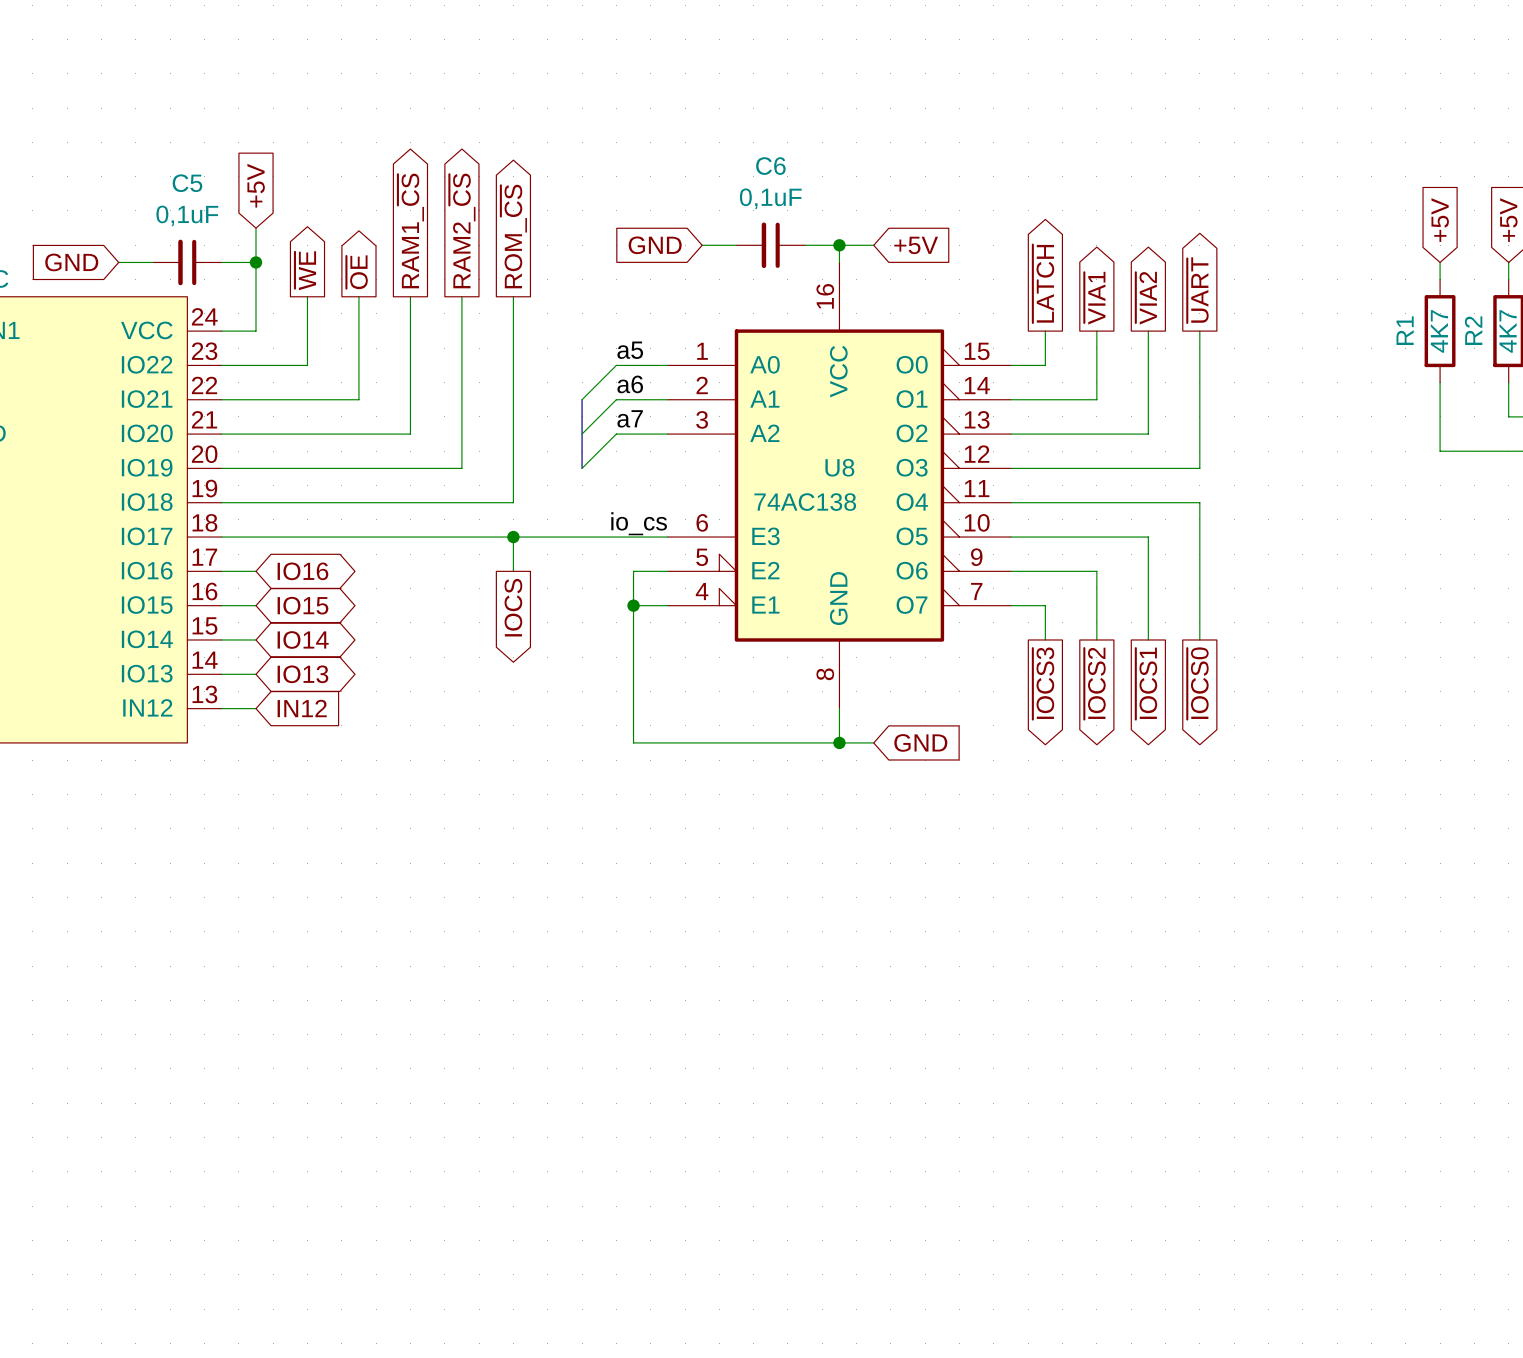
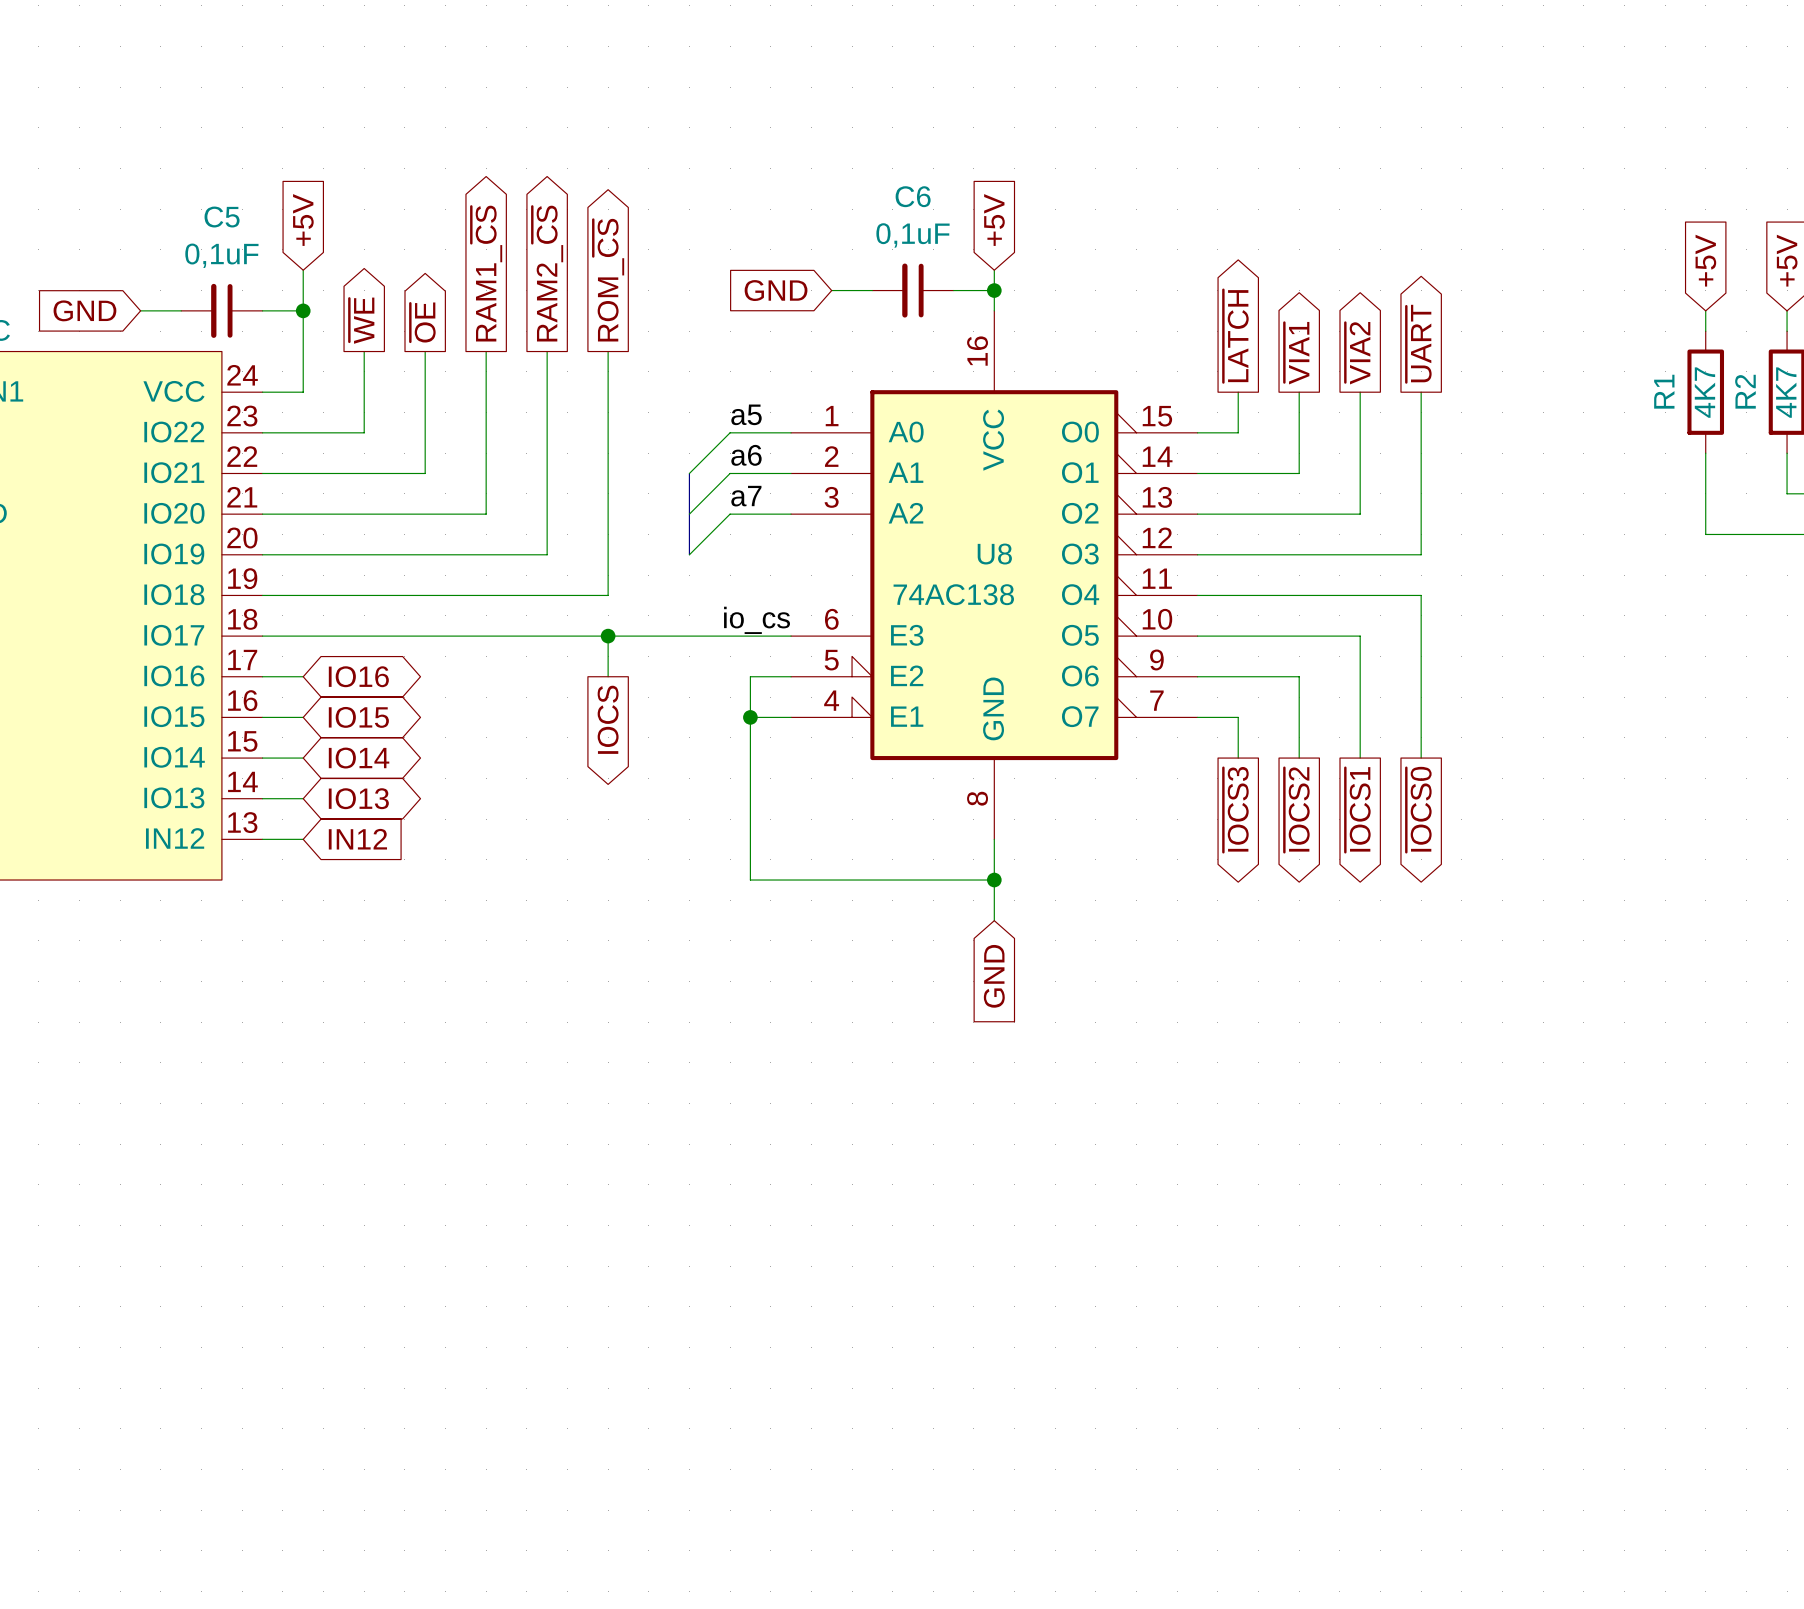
wire: (839, 245) (873, 245) -> (994, 290) (994, 270)
global label rotation: 0° (916, 245) -> 90° counterclockwise (994, 220)
global label position: +5V (916, 245) -> +5V (994, 220)
wire: (839, 742) (873, 742) -> (994, 880) (994, 920)
global label rotation: 0° (920, 742) -> 90° clockwise (994, 976)
global label position: GND (920, 742) -> GND (994, 976)

